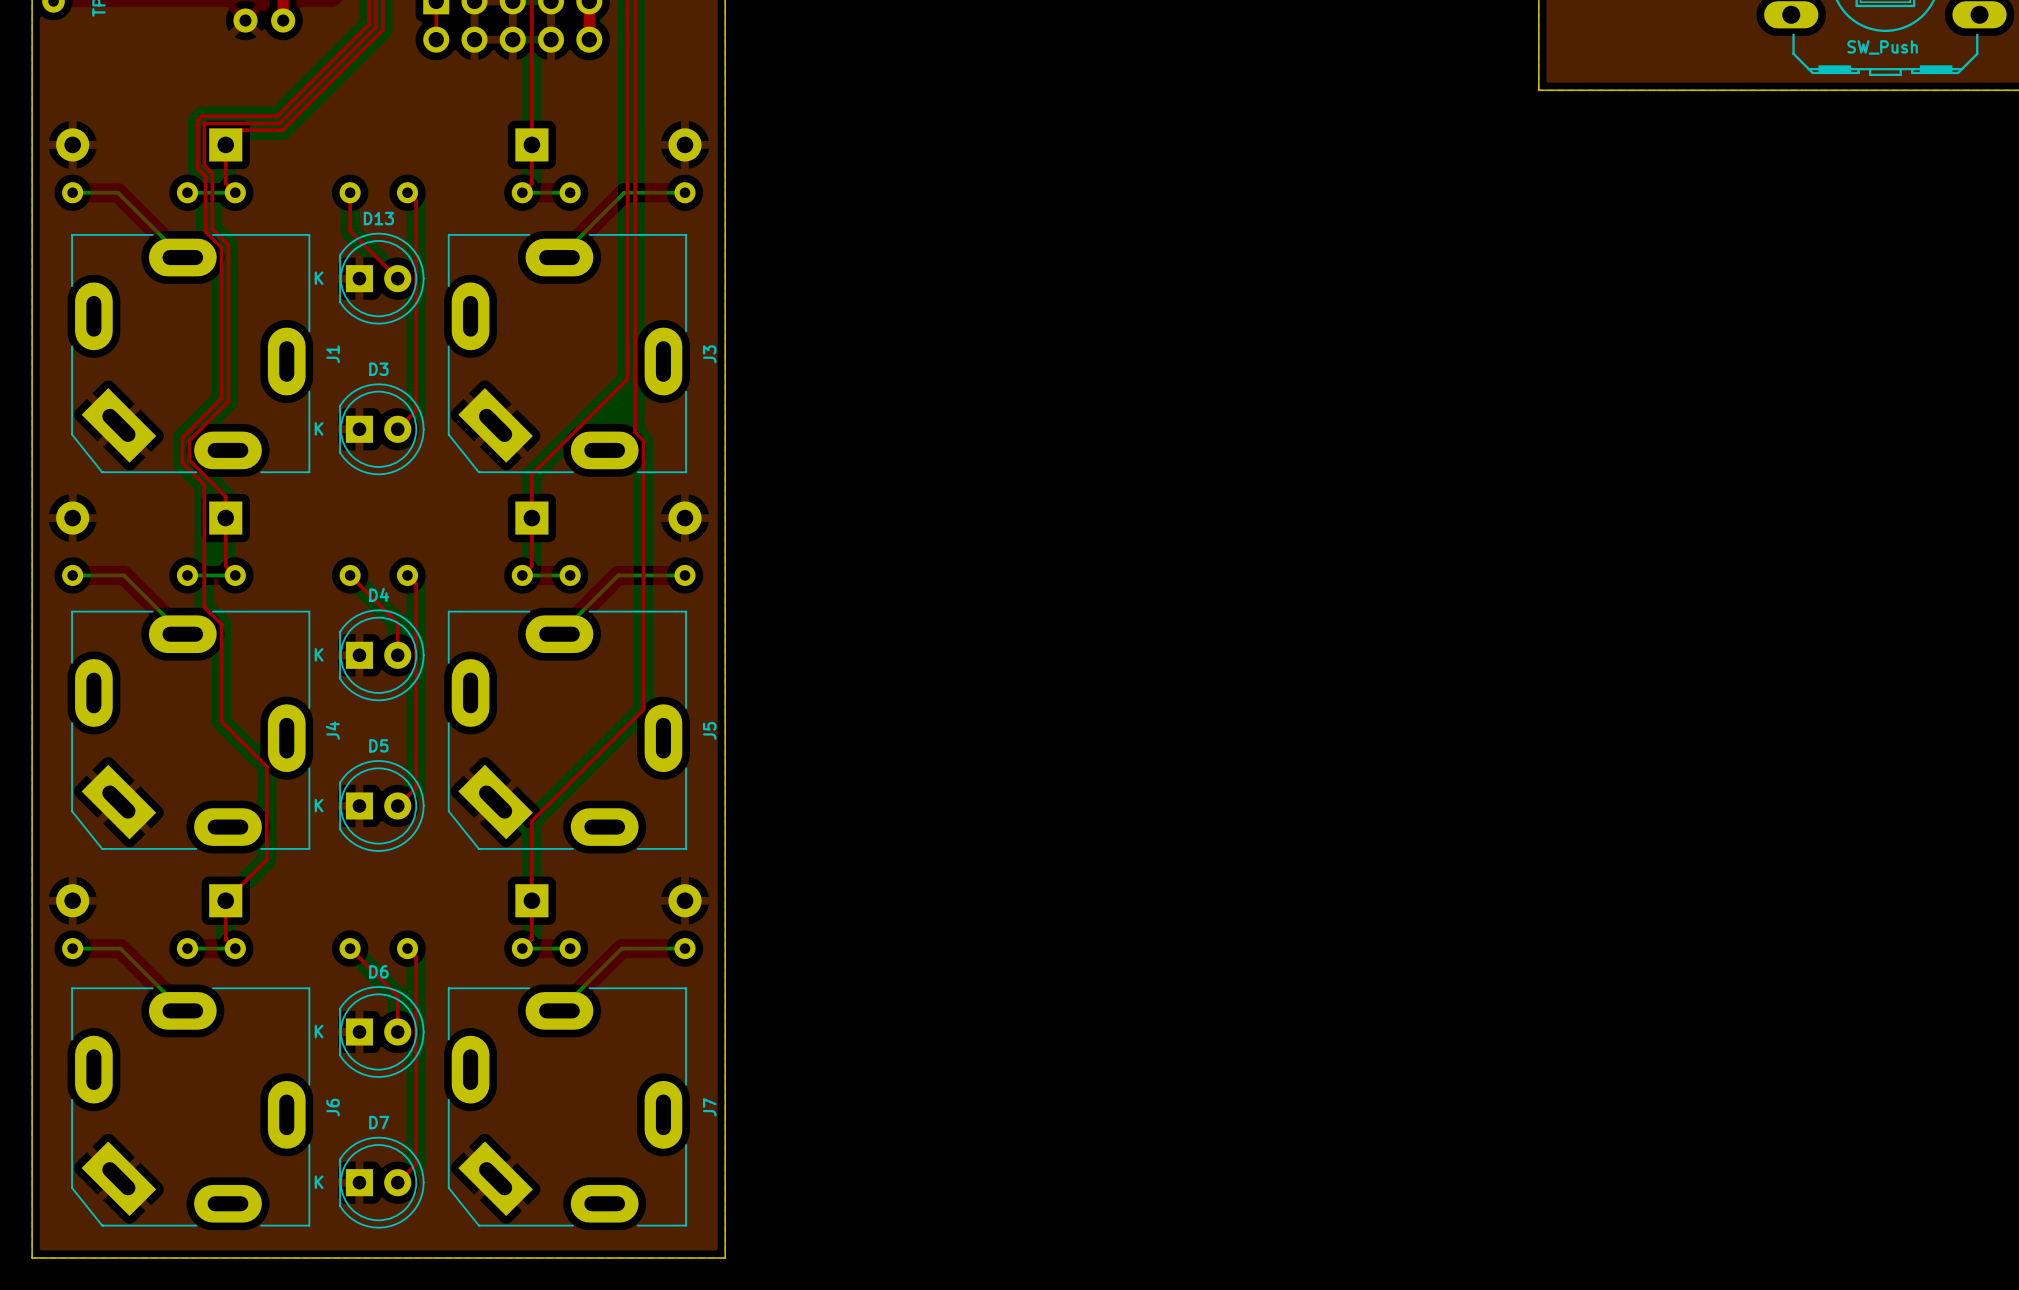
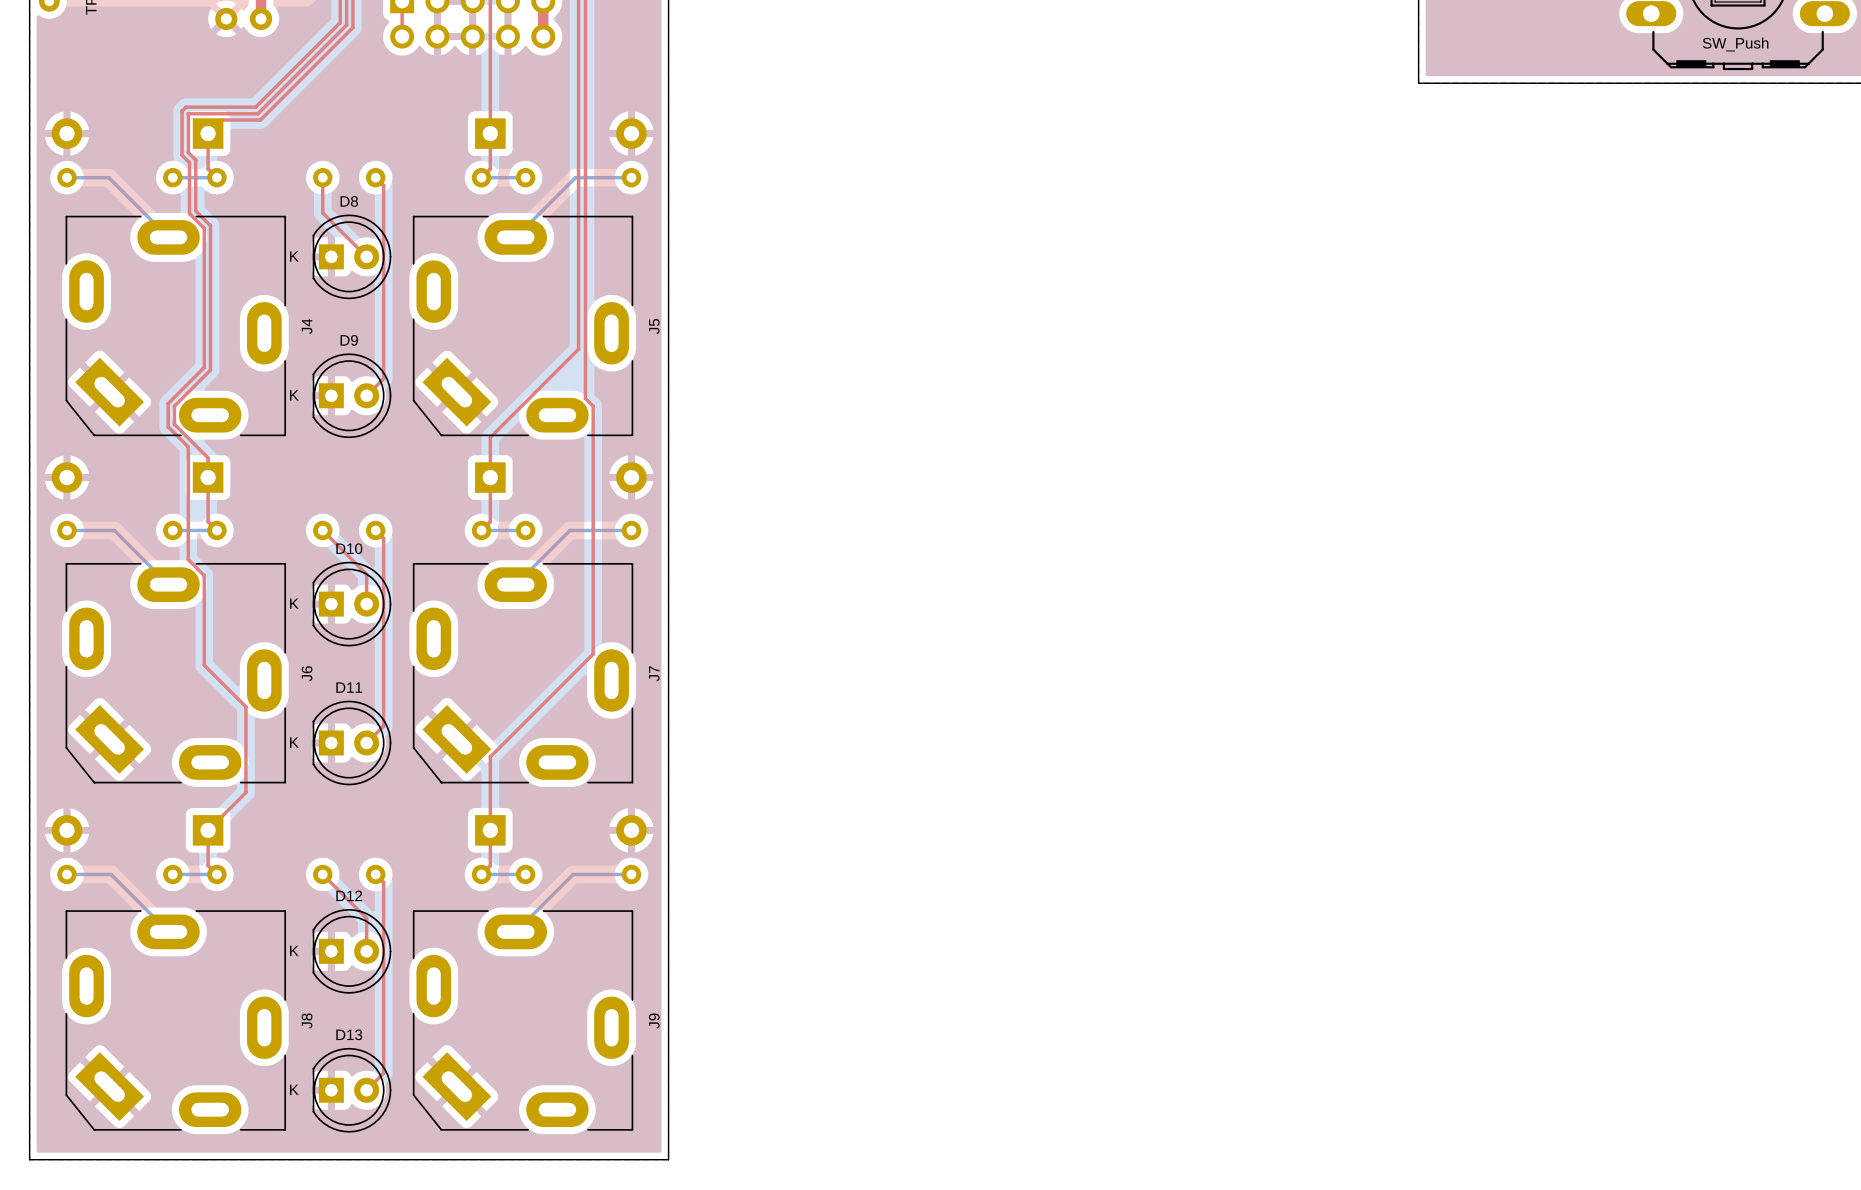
D13 name: D13 (378, 218) -> D8 (349, 201)
J1 name: J1 (333, 354) -> J4 (307, 326)
J3 name: J3 (709, 354) -> J5 (654, 326)
D3 name: D3 (378, 369) -> D9 (349, 340)
D4 name: D4 (379, 594) -> D10 (349, 548)
J4 name: J4 (332, 730) -> J6 (307, 673)
J5 name: J5 (709, 730) -> J7 (654, 673)
D5 name: D5 (378, 745) -> D11 (349, 687)
D6 name: D6 (378, 971) -> D12 (349, 895)
J6 name: J6 (333, 1107) -> J8 (307, 1021)
J7 name: J7 (709, 1107) -> J9 (654, 1021)
D7 name: D7 (379, 1122) -> D13 (349, 1034)

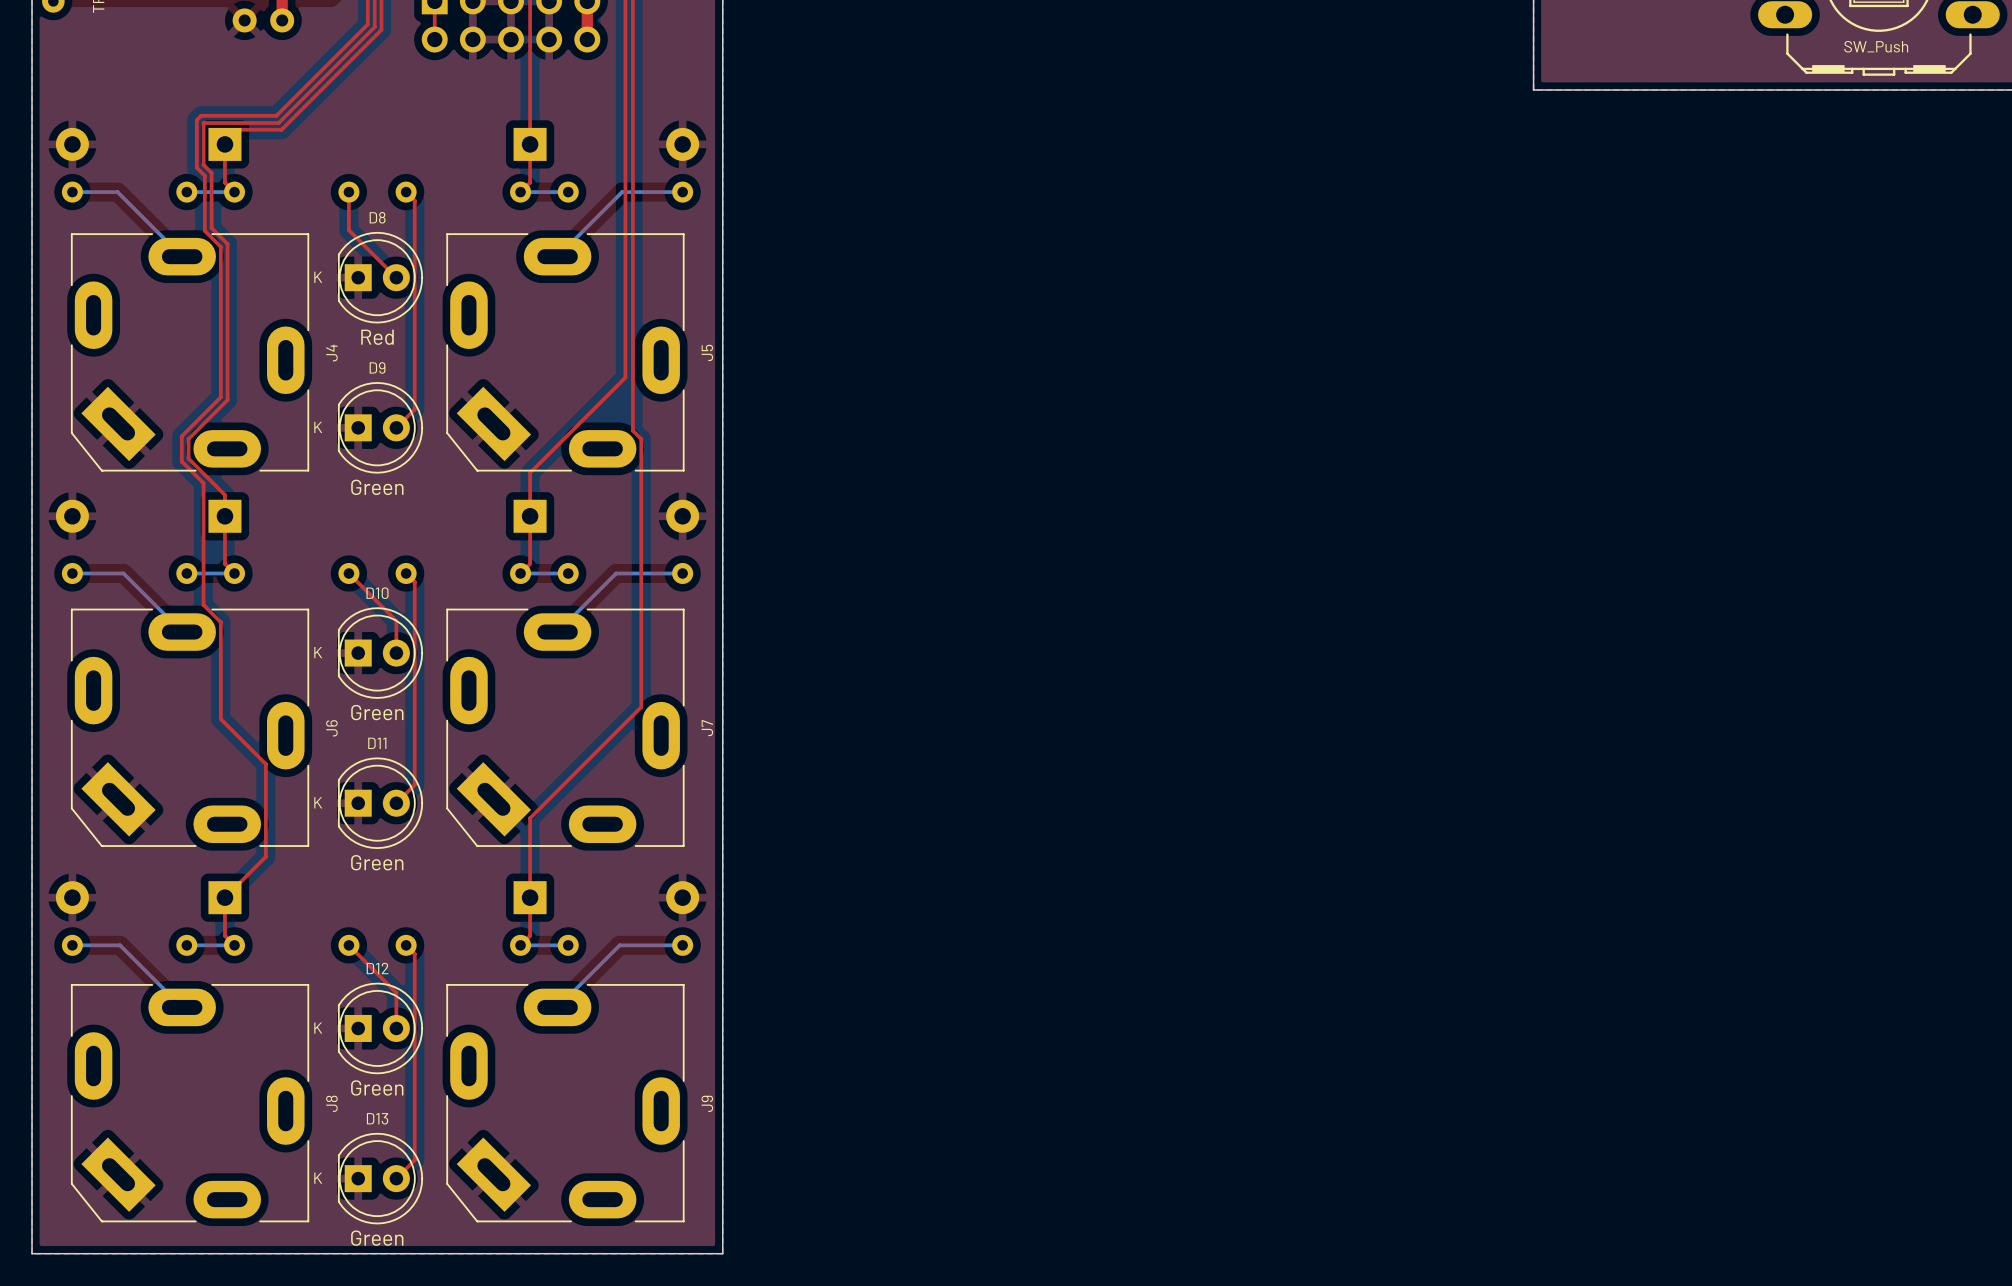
text: none -> Red (377, 337)
text: none -> Green (377, 487)
text: none -> Green (377, 712)
text: none -> Green (377, 862)
text: none -> Green (377, 1087)
text: none -> Green (377, 1238)

